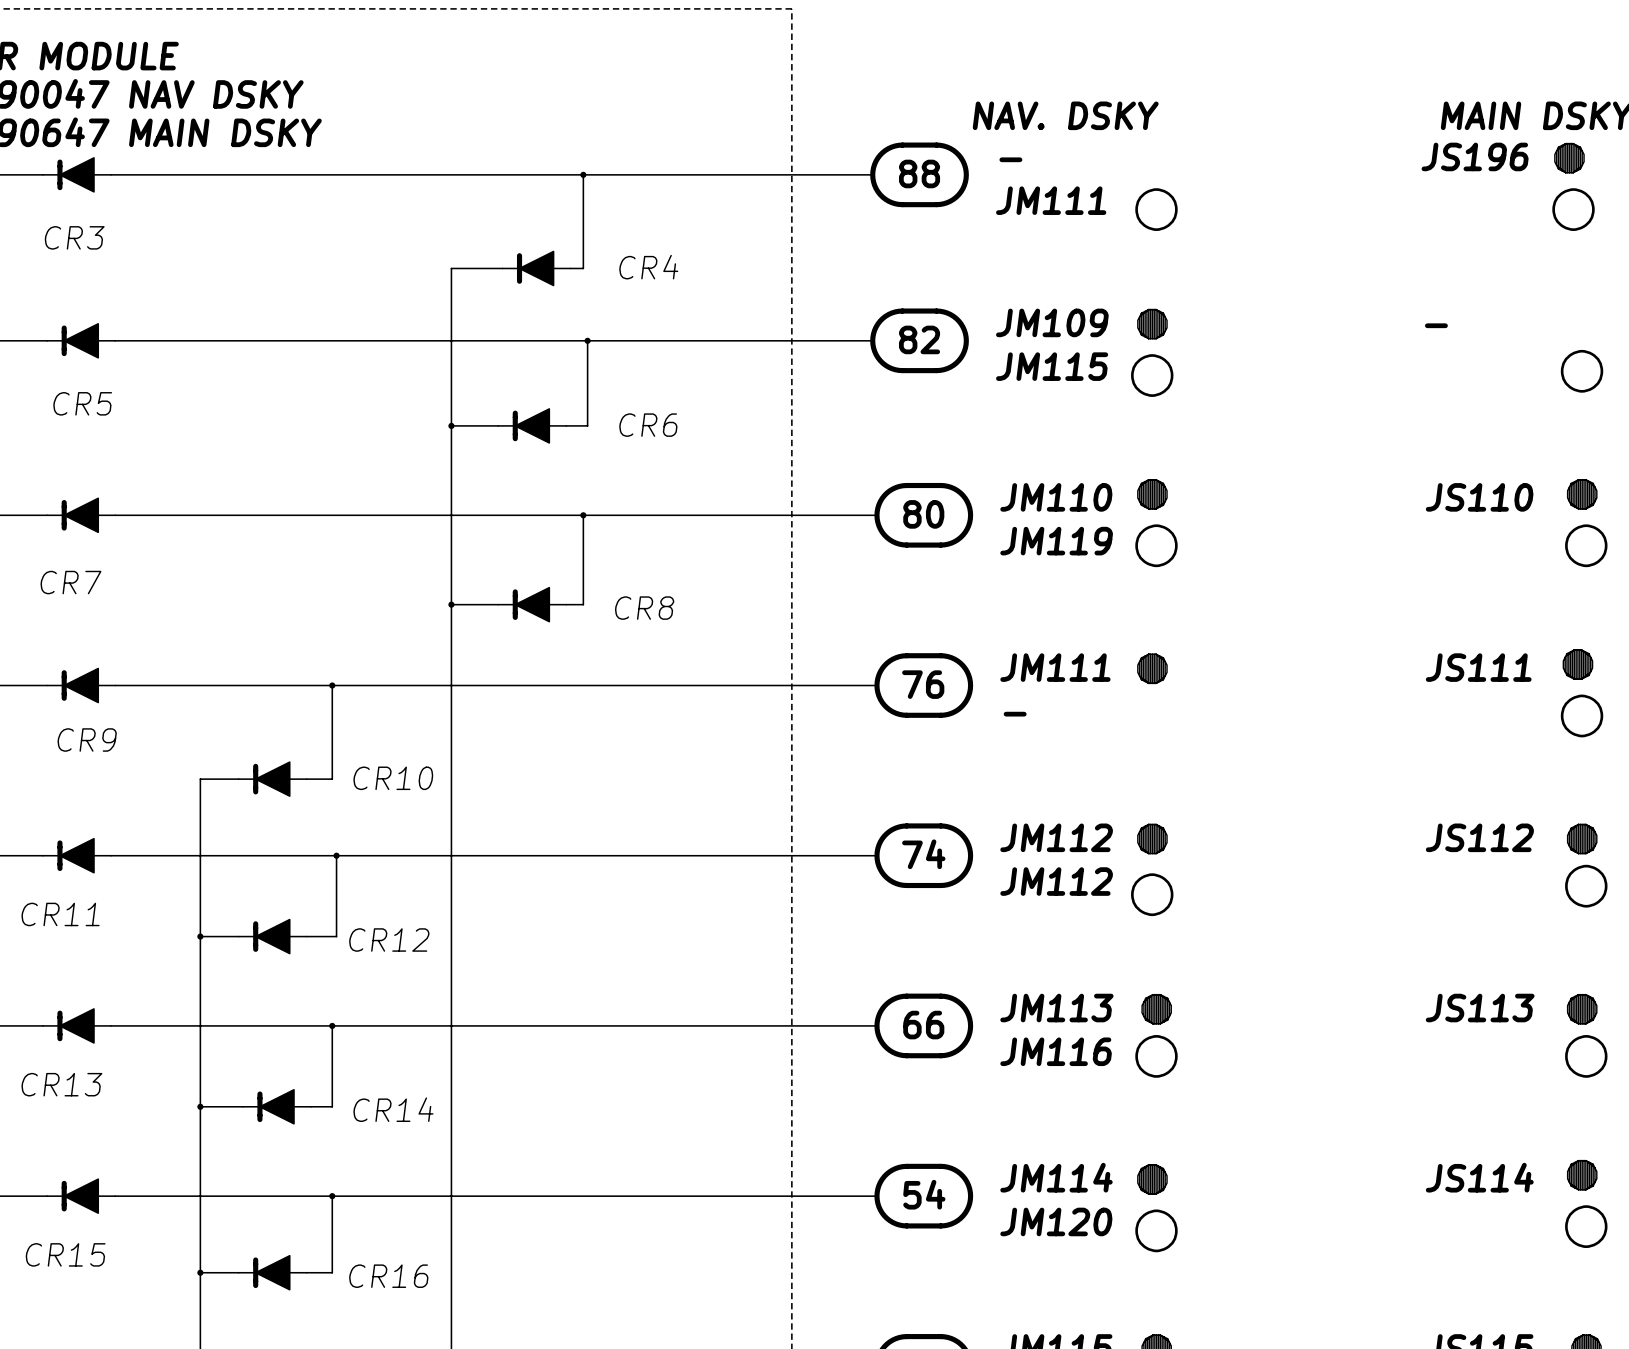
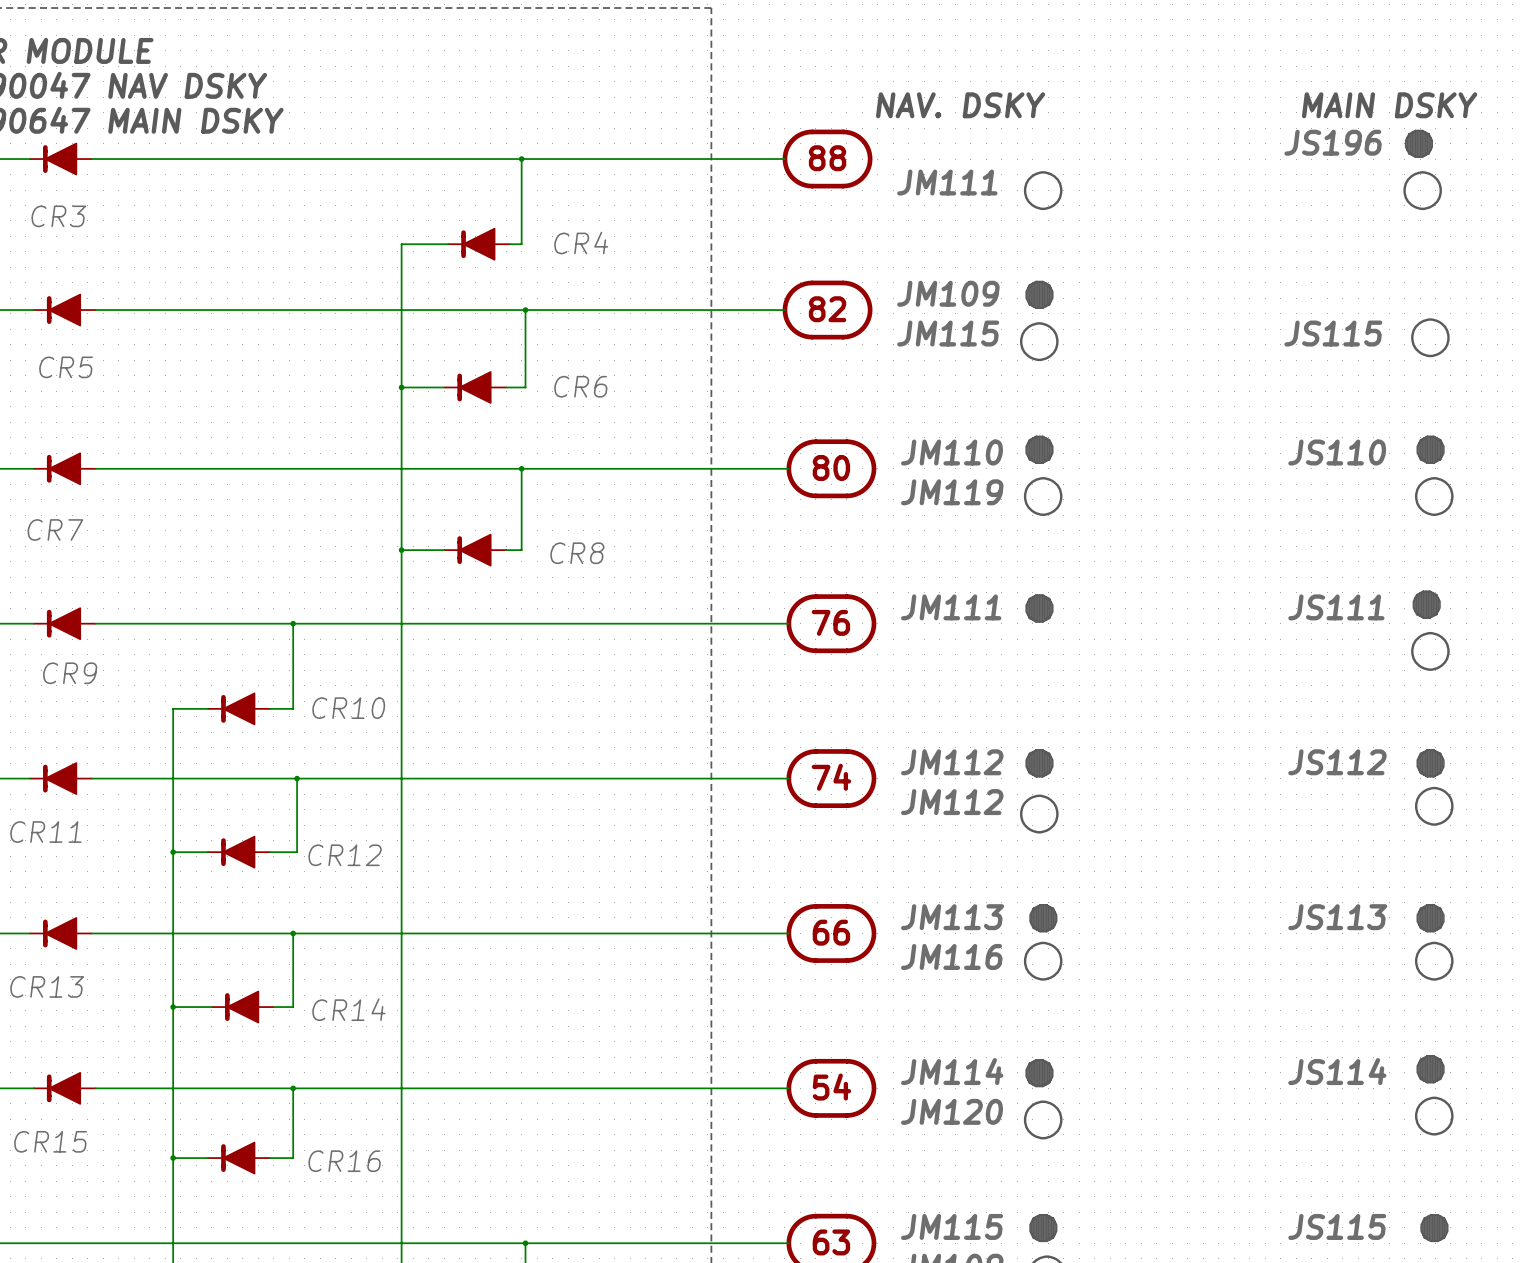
part text: - (1010, 159) -> none
part text: - (1436, 325) -> JS115 (1333, 333)
part text: - (1015, 714) -> none

